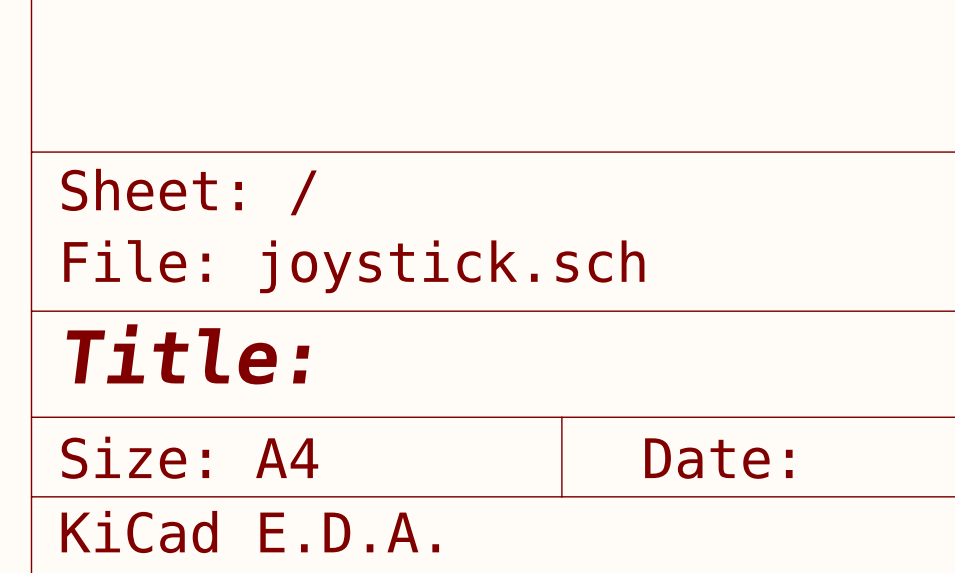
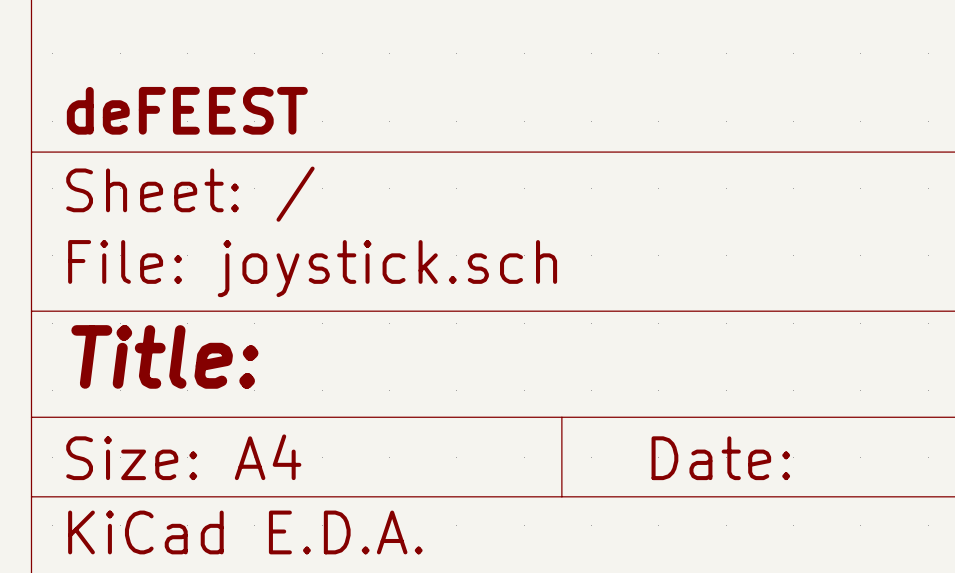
title block: none -> deFEEST (187, 110)

